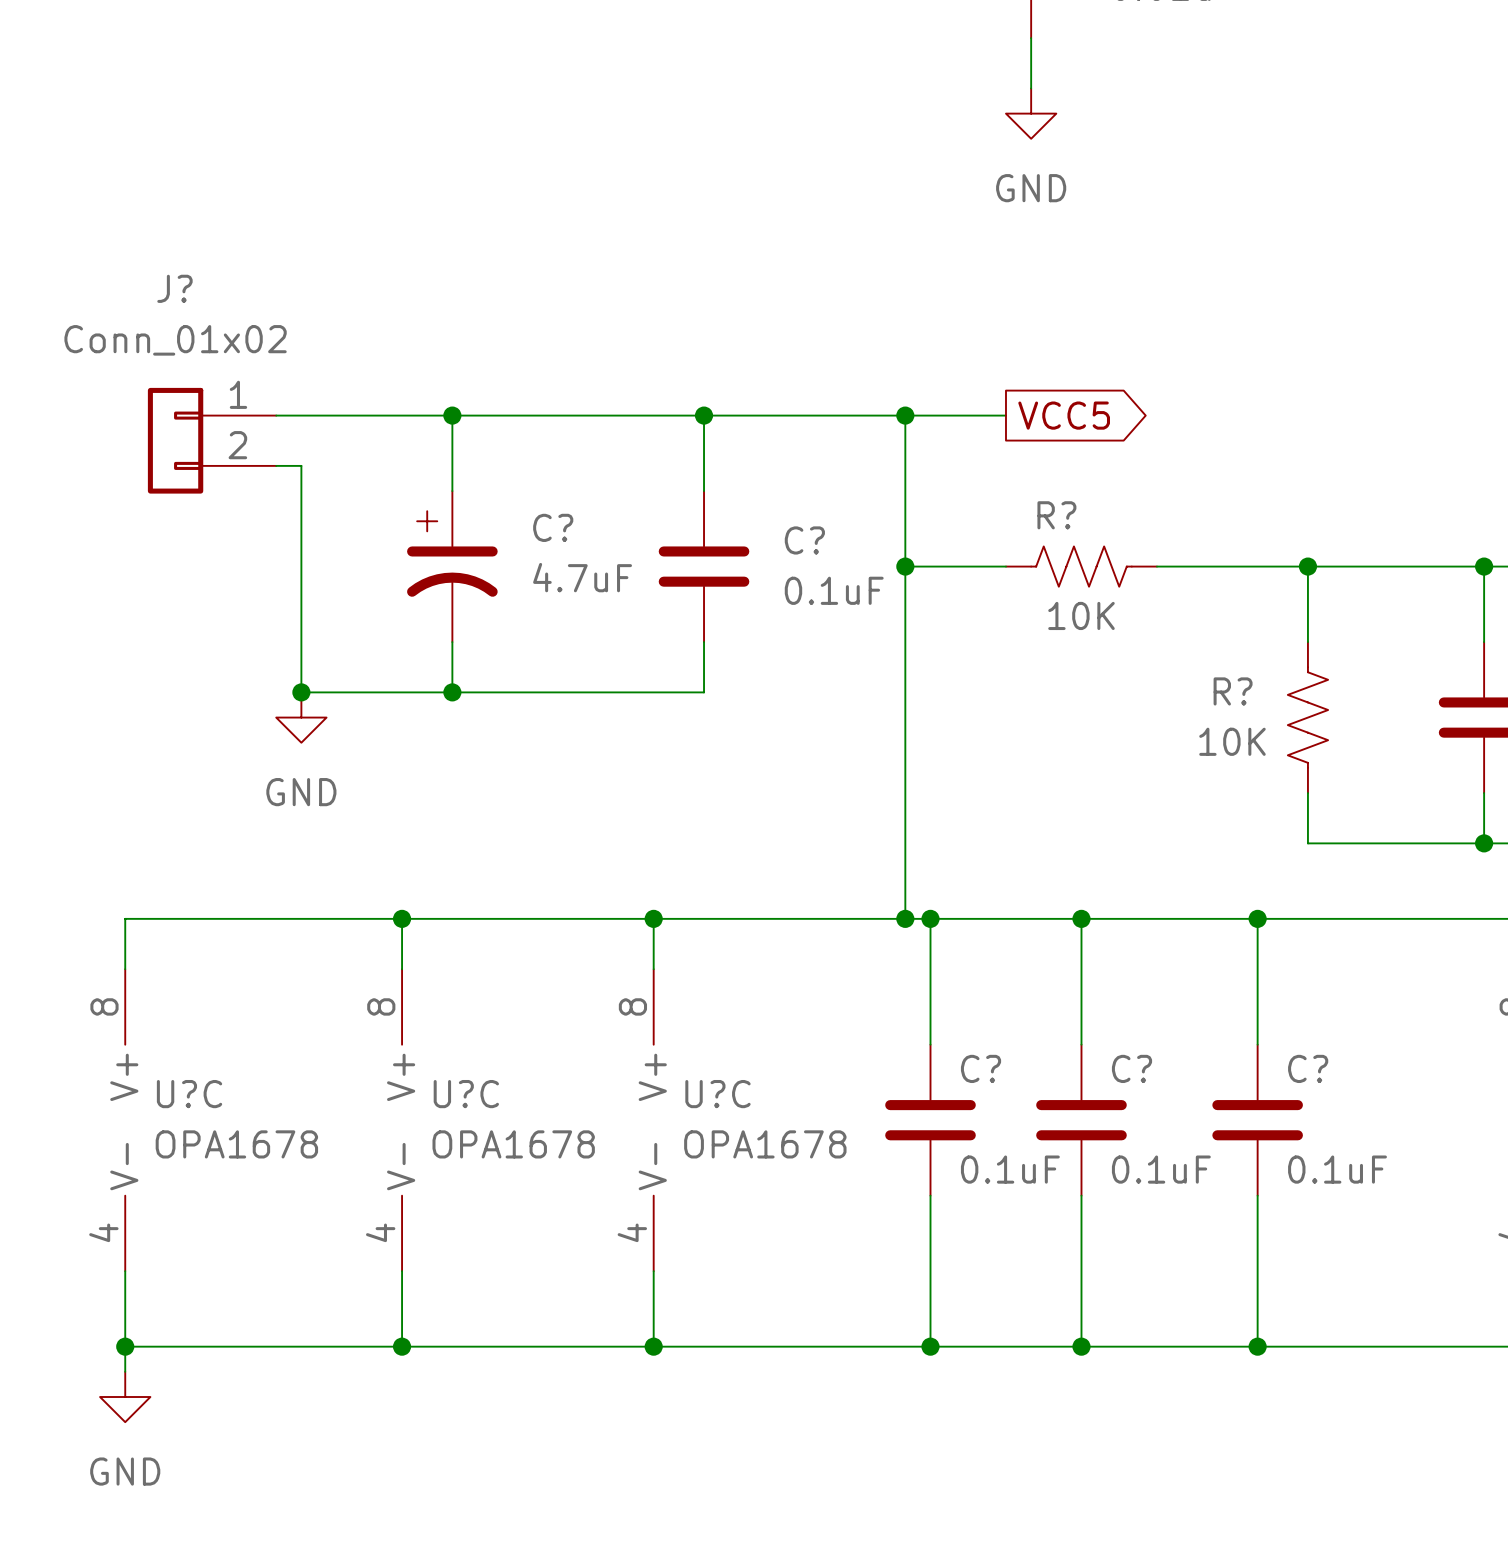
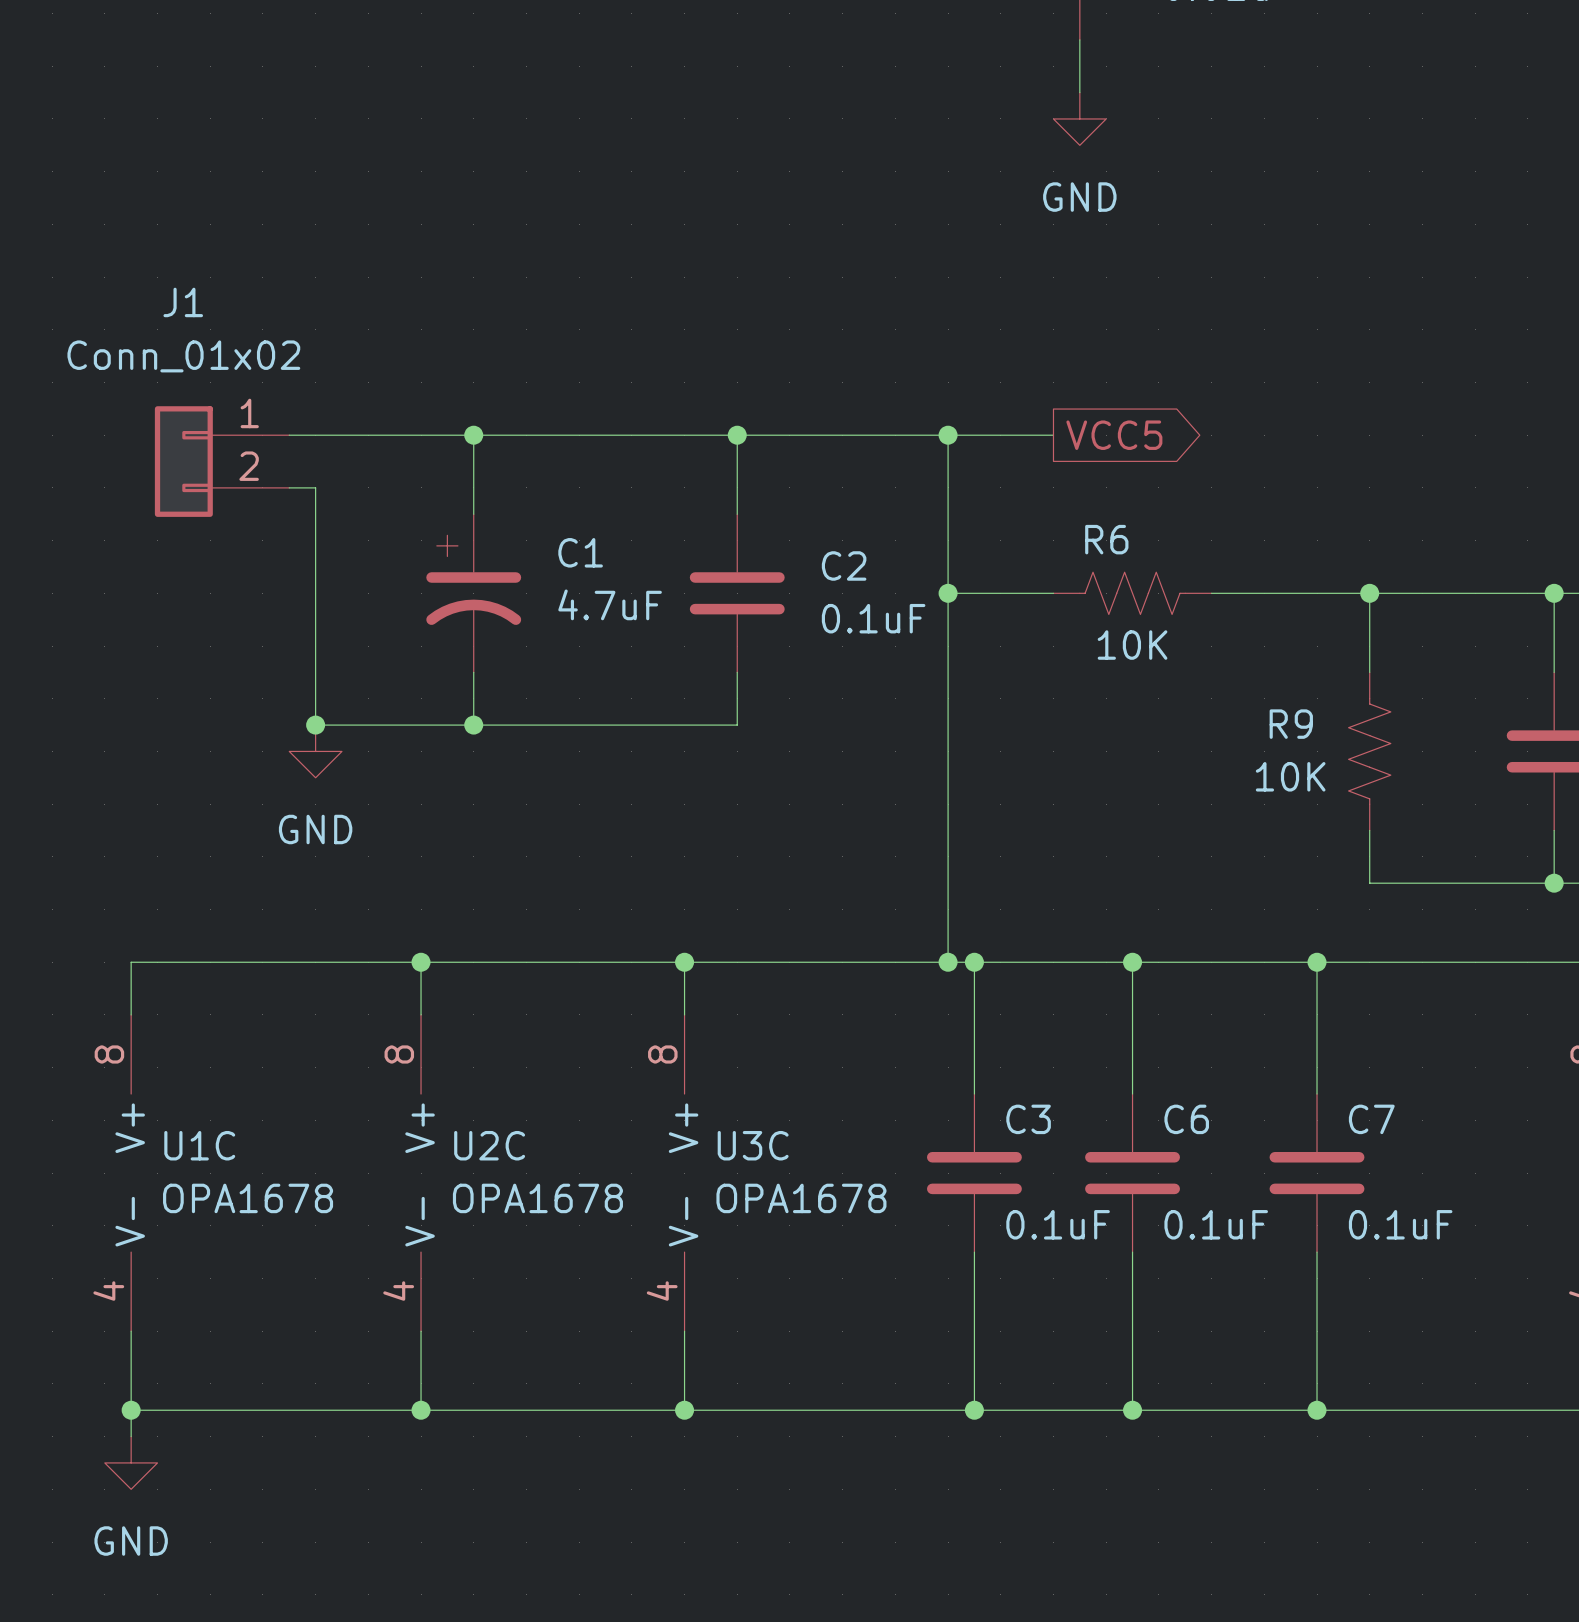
J? name: J? (174, 288) -> J1 (183, 302)
R? name: R? (1056, 515) -> R6 (1106, 539)
C? name: C? (553, 527) -> C1 (580, 552)
C? name: C? (804, 540) -> C2 (844, 565)
R? name: R? (1233, 691) -> R9 (1291, 724)
C? name: C? (981, 1068) -> C3 (1028, 1119)
C? name: C? (1132, 1068) -> C6 (1186, 1119)
C? name: C? (1308, 1068) -> C7 (1371, 1119)
U?C name: U?C (189, 1094) -> U1C (199, 1145)
U?C name: U?C (466, 1094) -> U2C (489, 1145)
U?C name: U?C (717, 1094) -> U3C (753, 1145)

